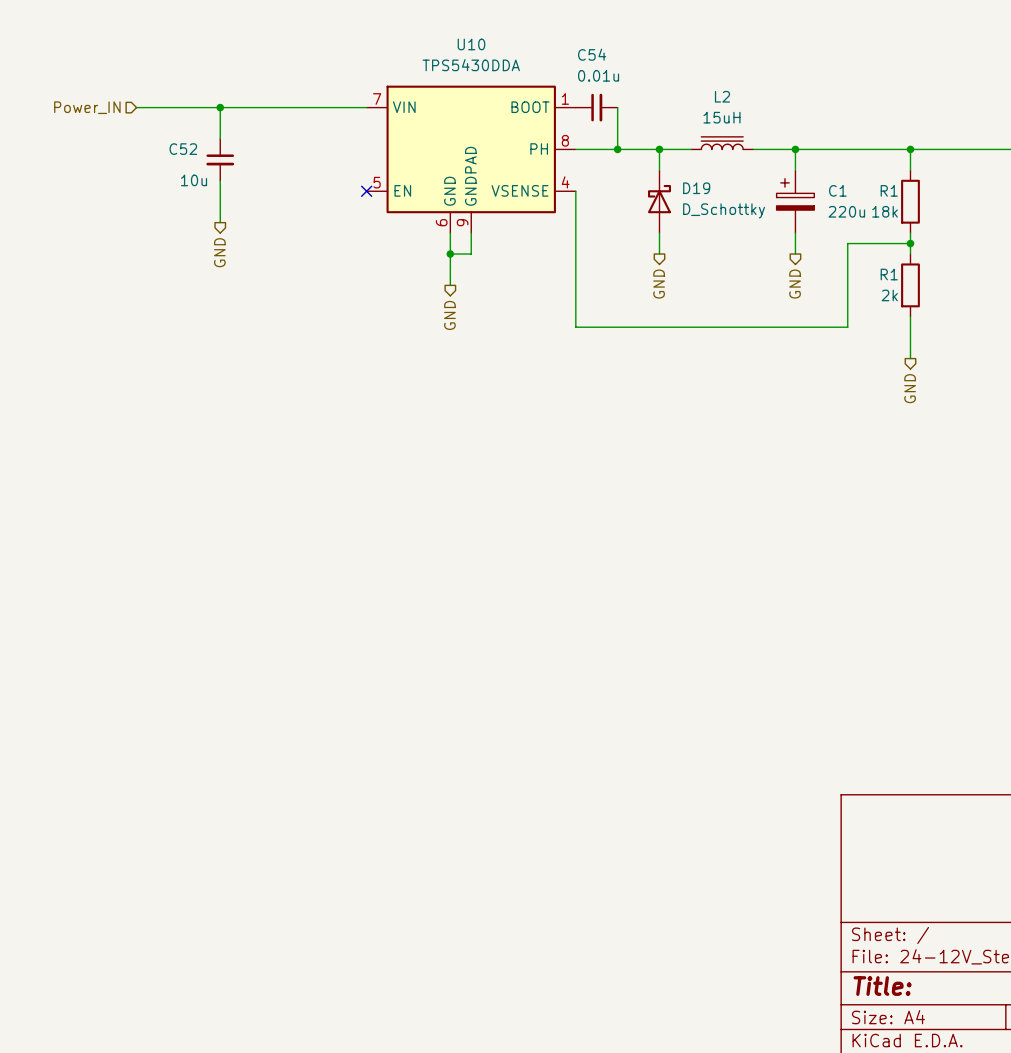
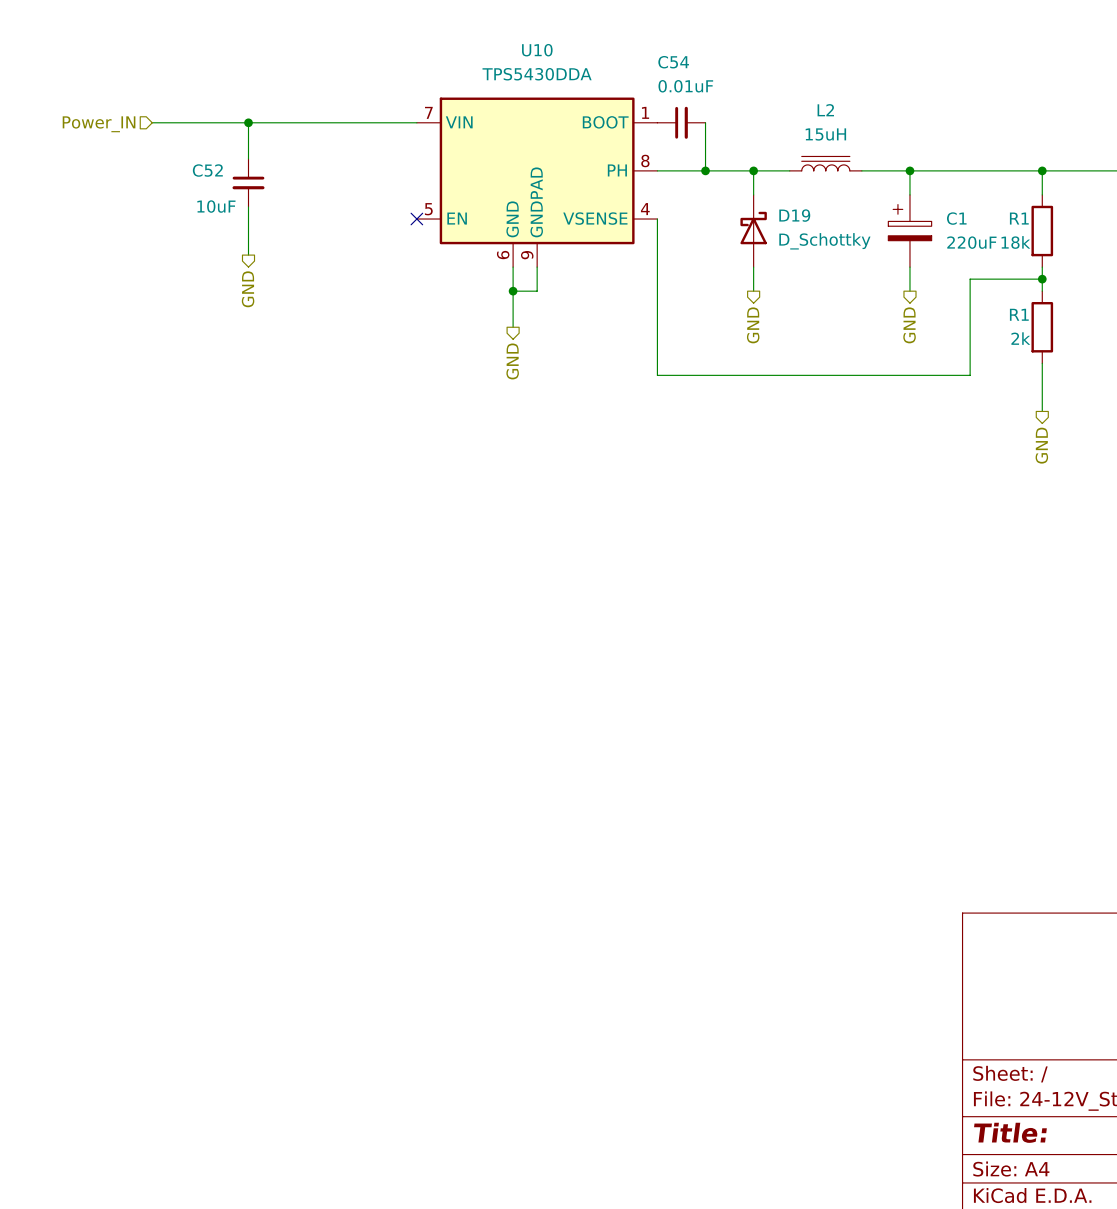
C54 value: 0.01u (598, 75) -> 0.01uF (685, 86)
C52 value: 10u (194, 180) -> 10uF (216, 206)
C1 value: 220u (846, 211) -> 220uF (971, 242)

